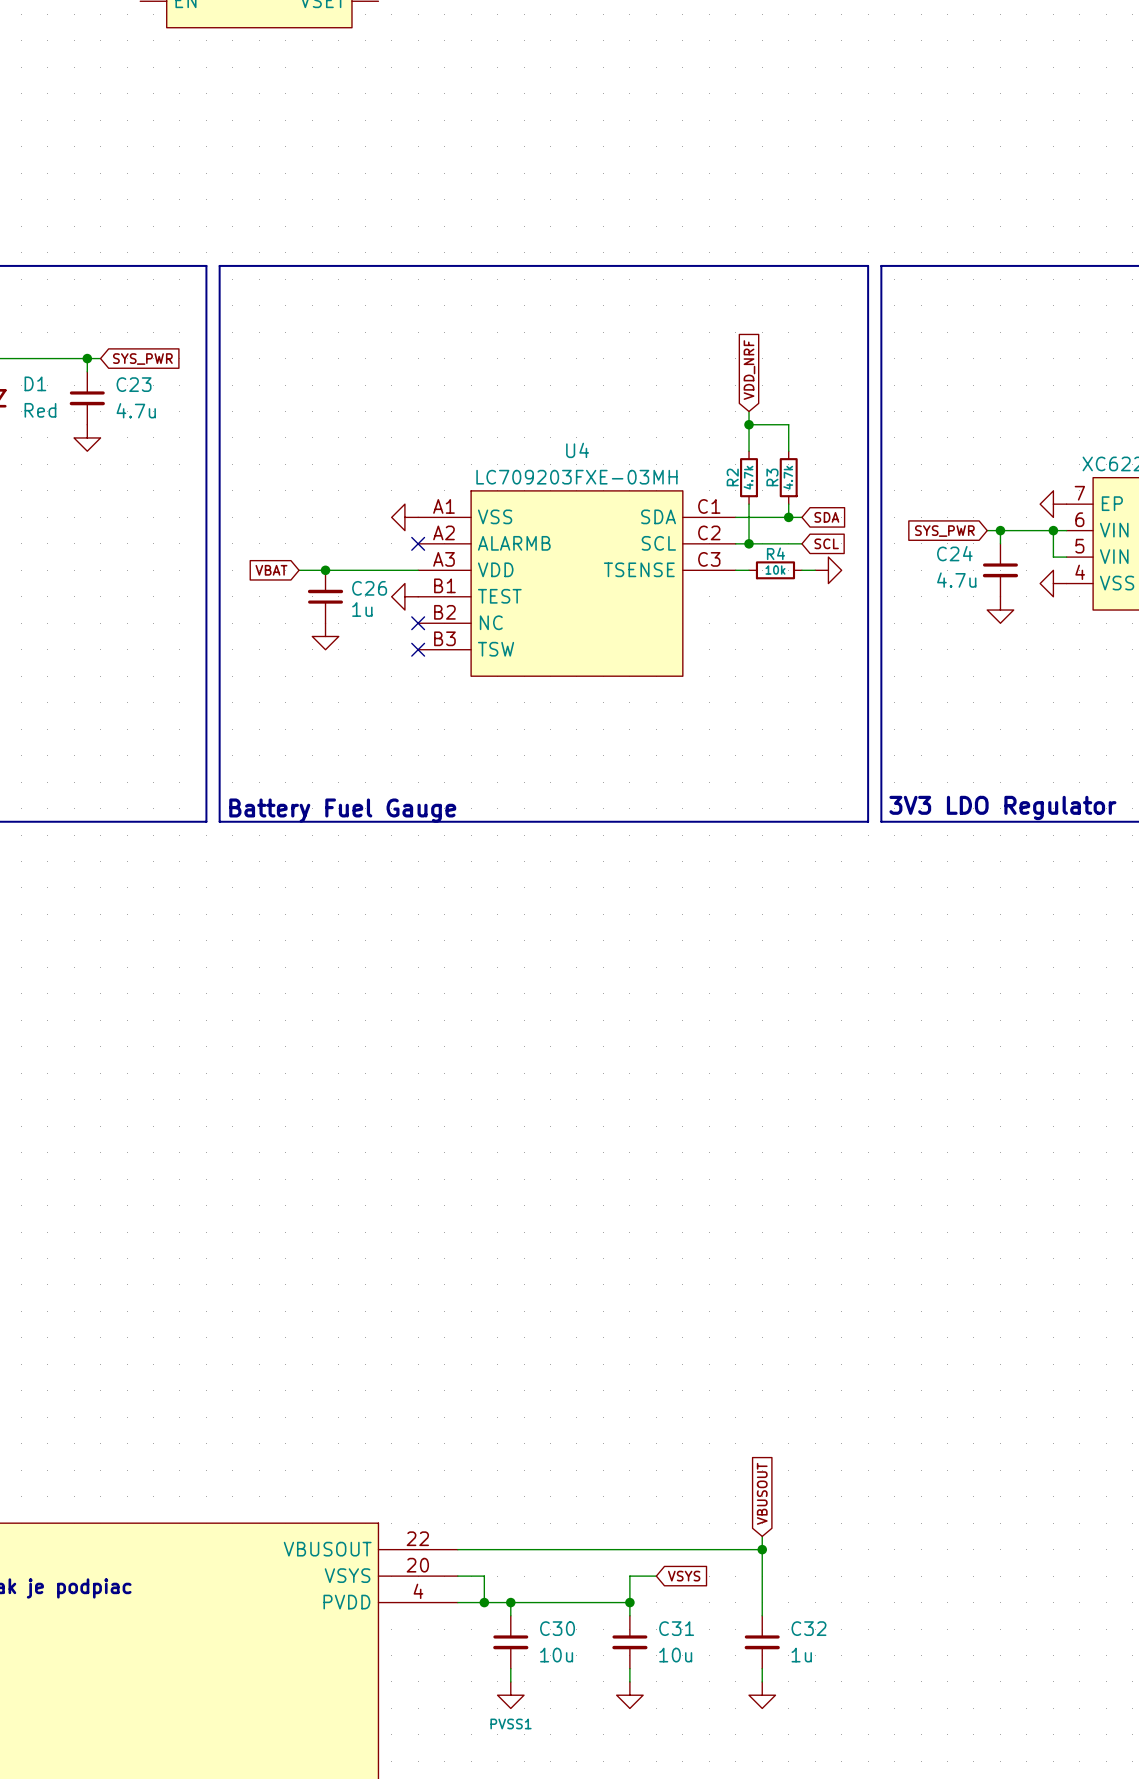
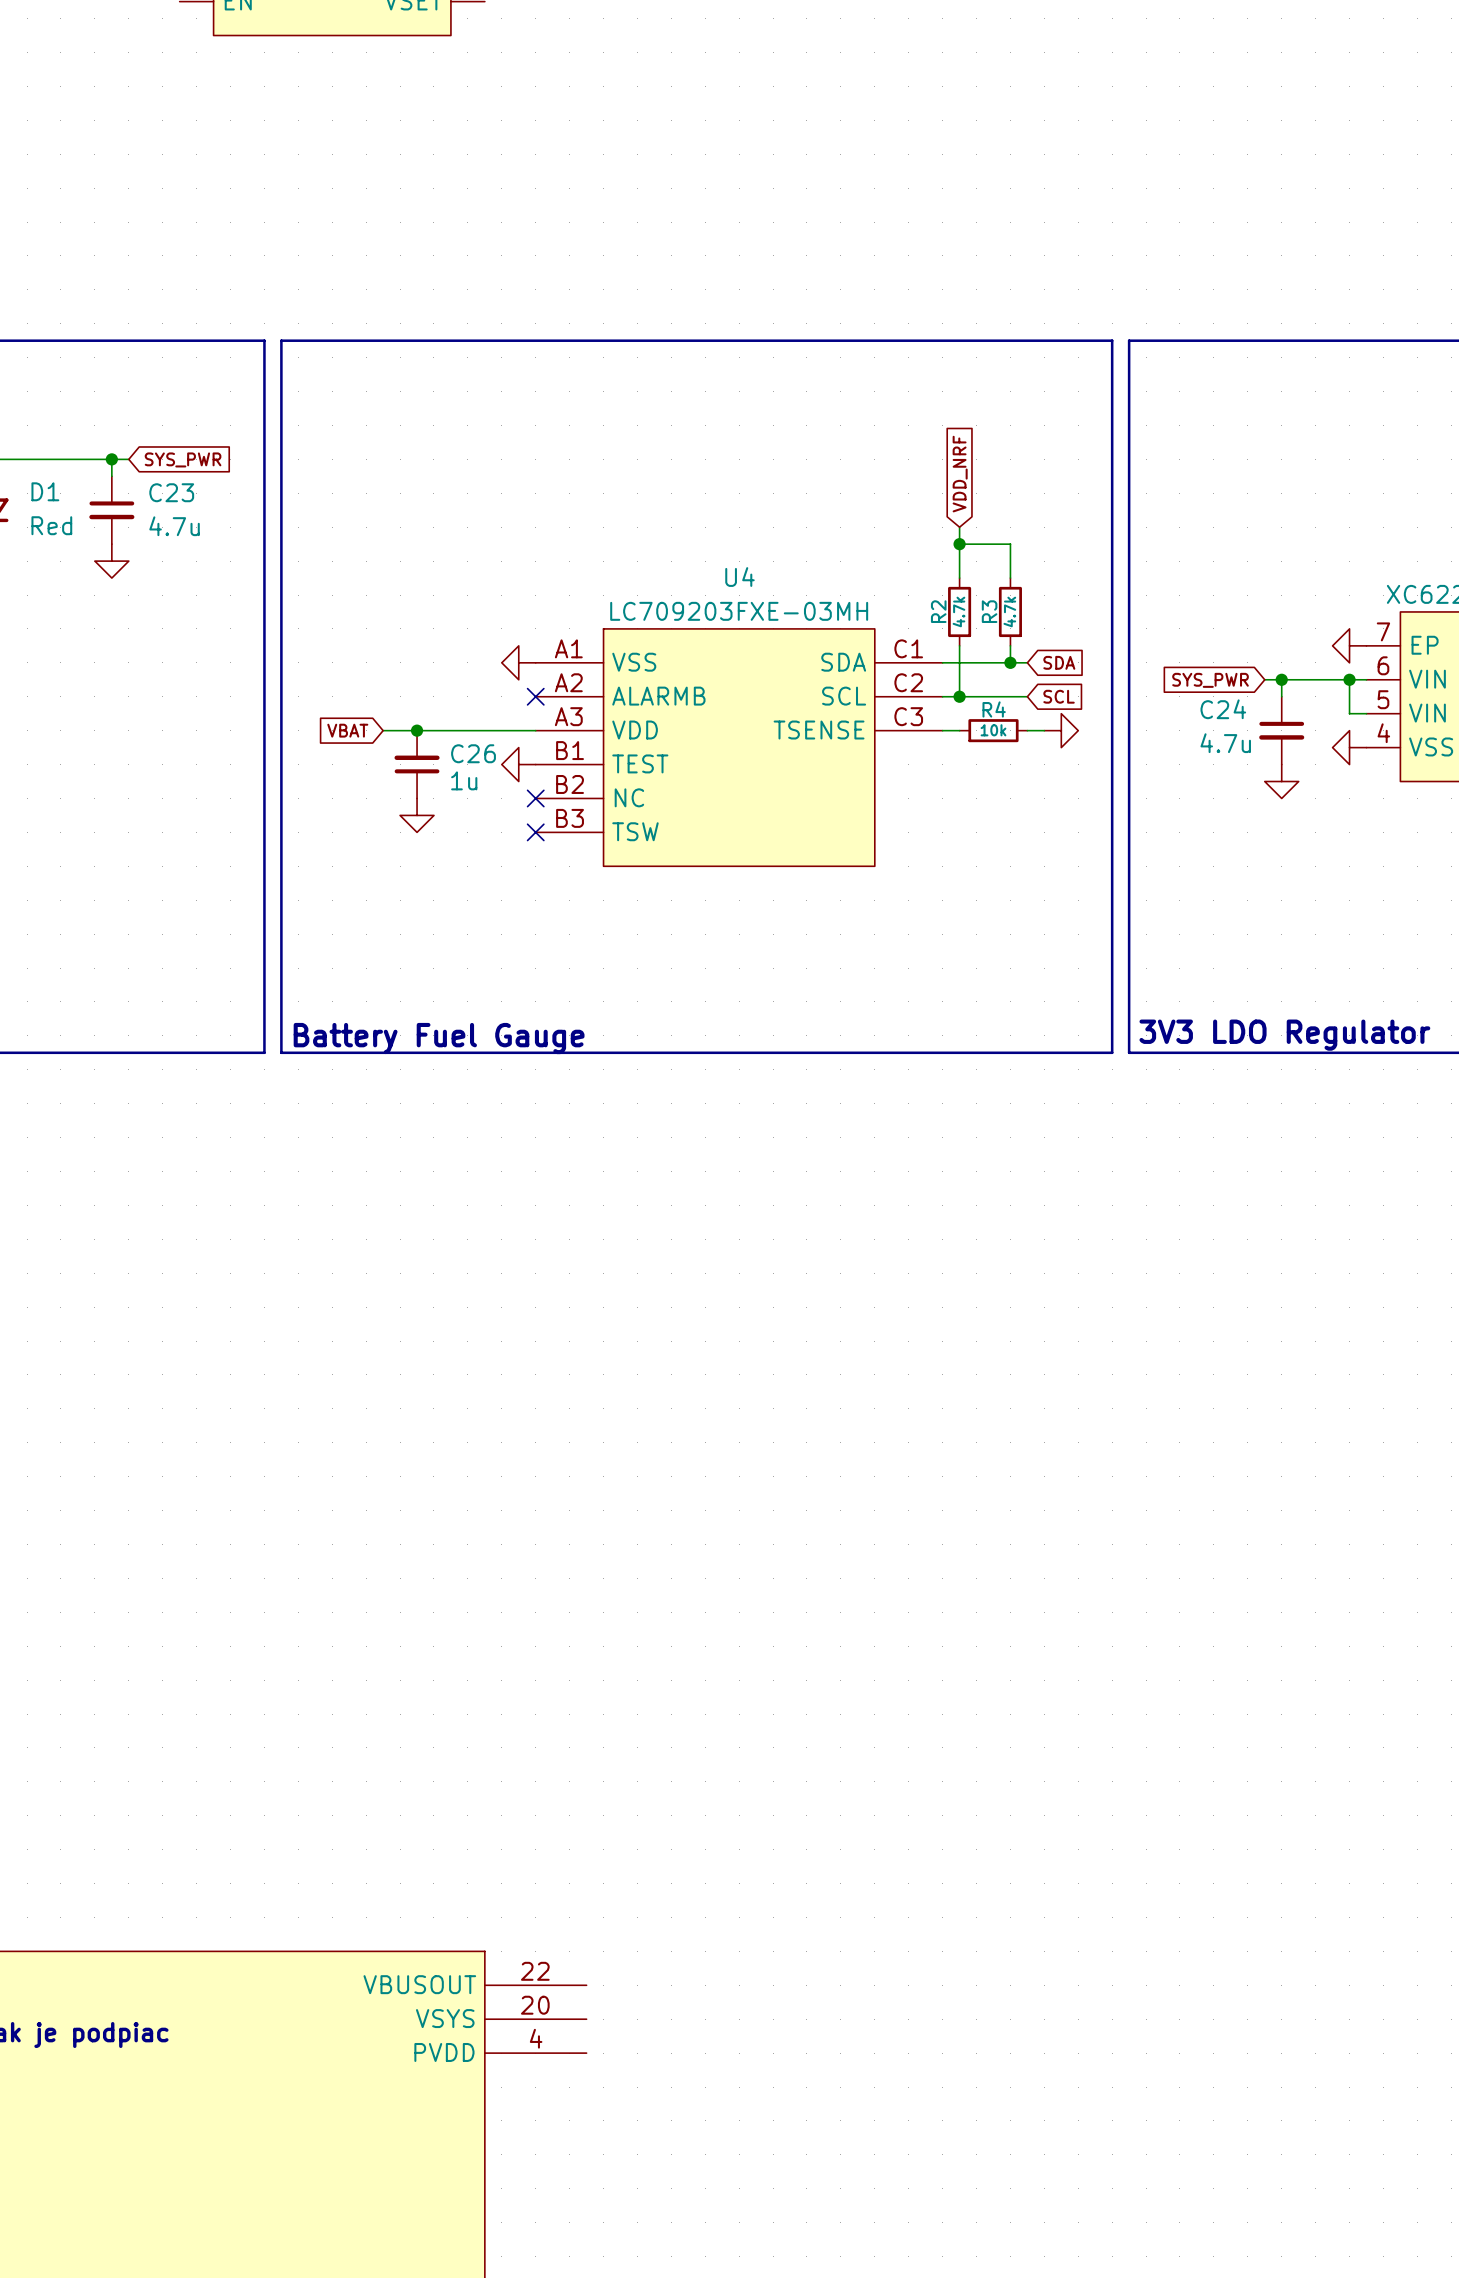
global label: VBUSOUT (762, 1493) -> none
wire: (762, 1536) (762, 1615) -> none
wire: (457, 1549) (762, 1549) -> none
junction: (762, 1549) -> none
wire: (457, 1576) (484, 1576) (484, 1602) -> none
wire: (656, 1576) (629, 1576) (629, 1615) -> none
global label: VSYS (684, 1576) -> none
wire: (457, 1602) (629, 1602) -> none
junction: (484, 1602) -> none
wire: (510, 1602) (510, 1615) -> none
junction: (510, 1602) -> none
junction: (629, 1602) -> none
C30: 10u (510, 1642) -> none
C31: 10u (629, 1642) -> none
C32: 1u (762, 1642) -> none
wire: (510, 1668) (510, 1681) -> none
wire: (629, 1668) (629, 1681) -> none
wire: (762, 1668) (762, 1681) -> none
power symbol: PVSS1 (510, 1695) -> none
power symbol: (629, 1695) -> none
power symbol: (762, 1695) -> none

